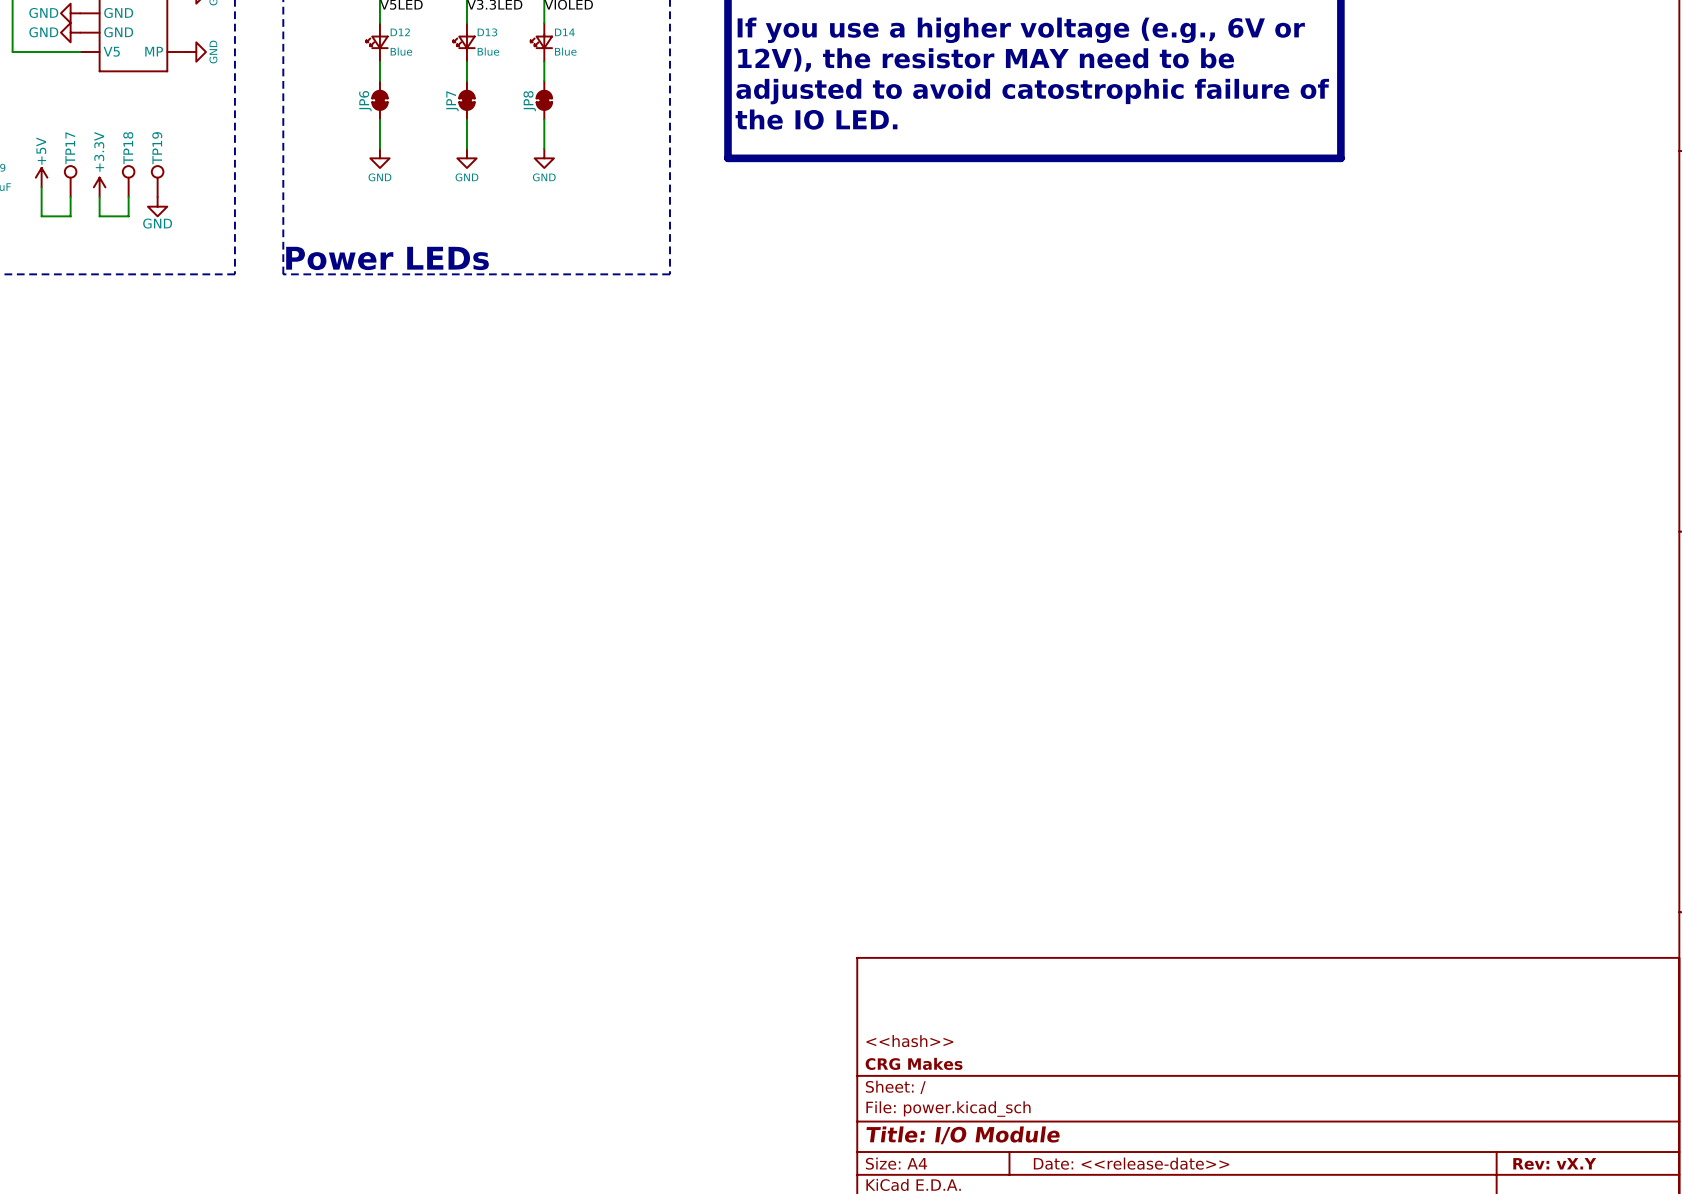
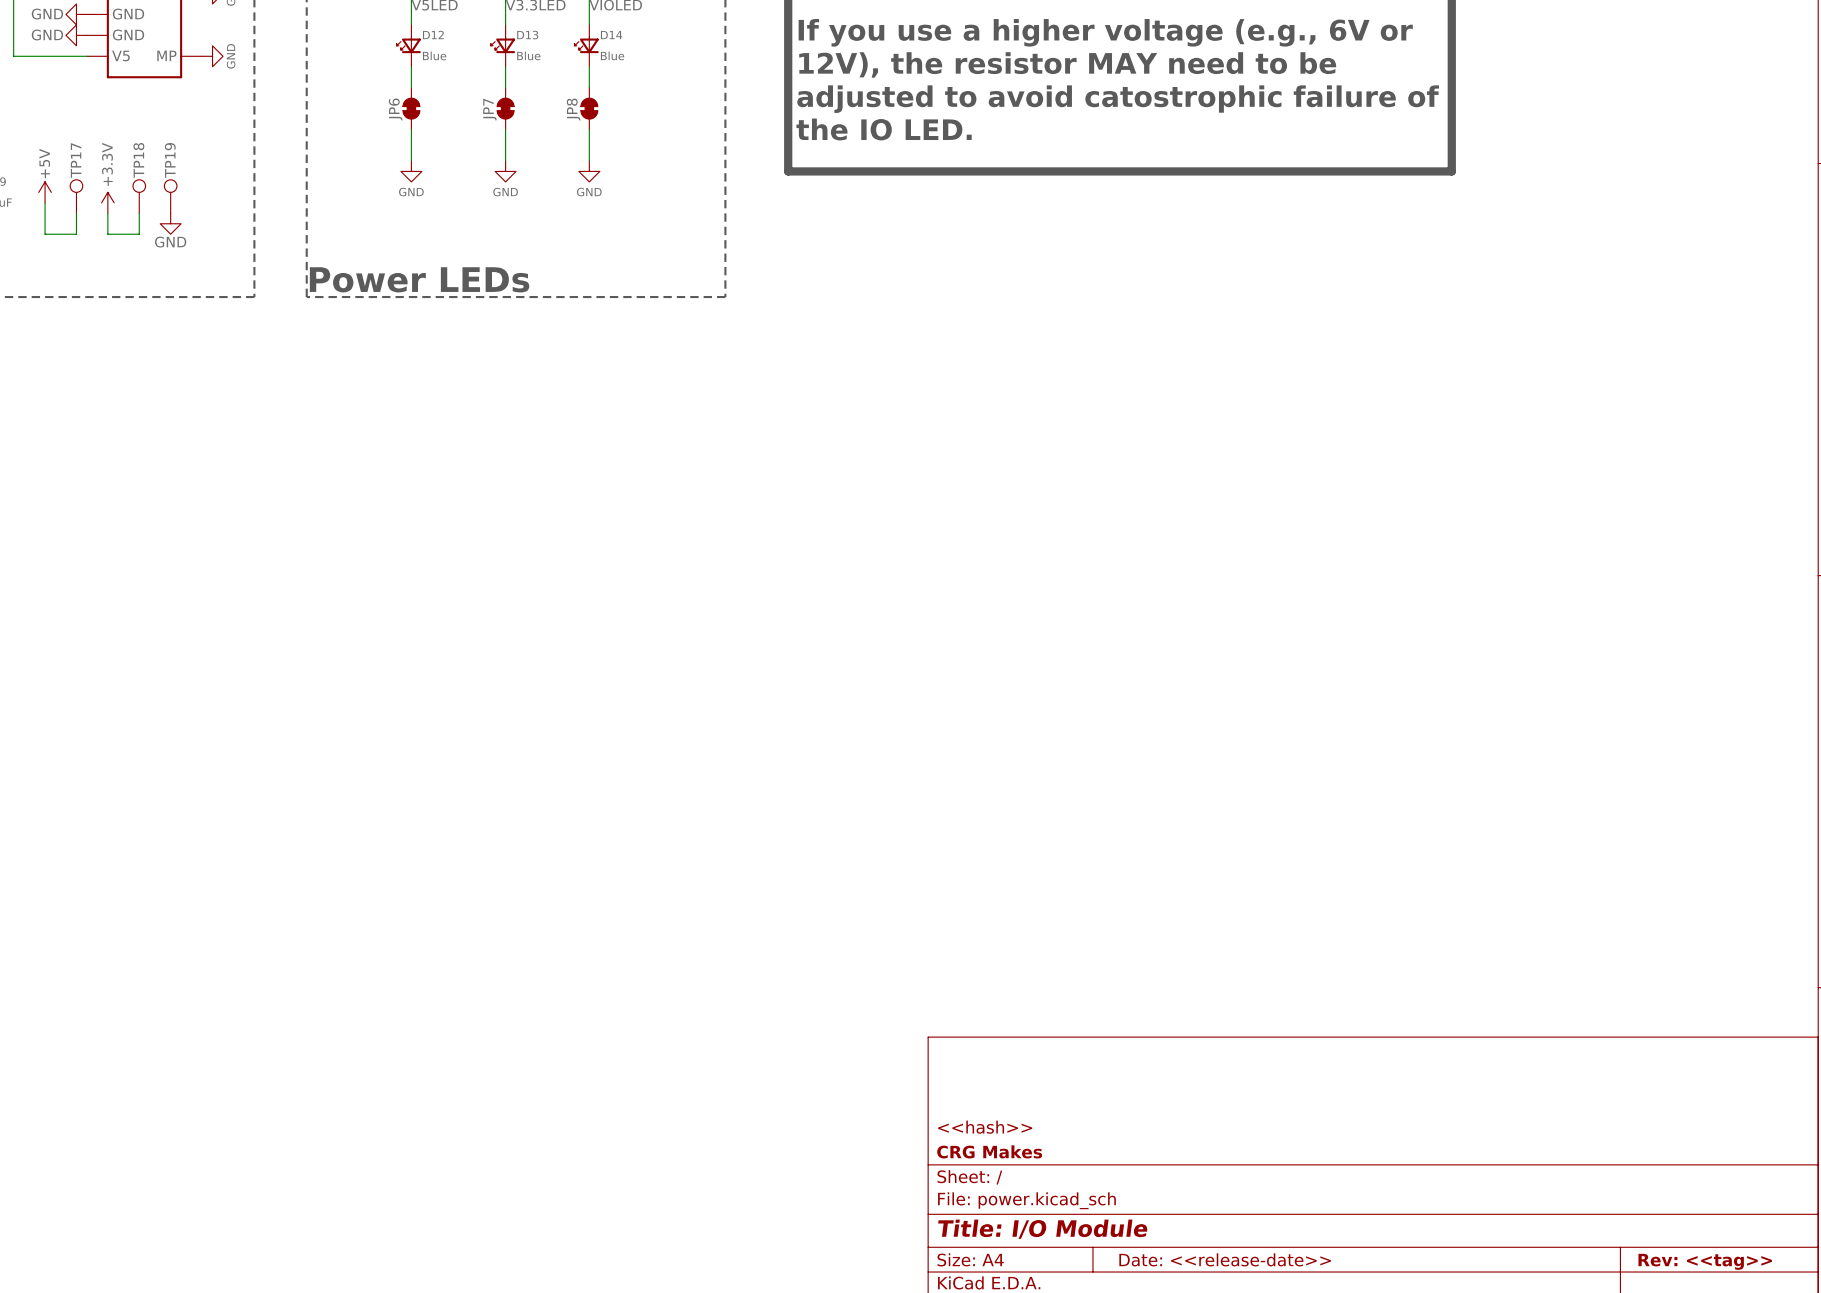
title block: Rev: vX.Y (1554, 1163) -> Rev: <<tag>> (1705, 1261)

